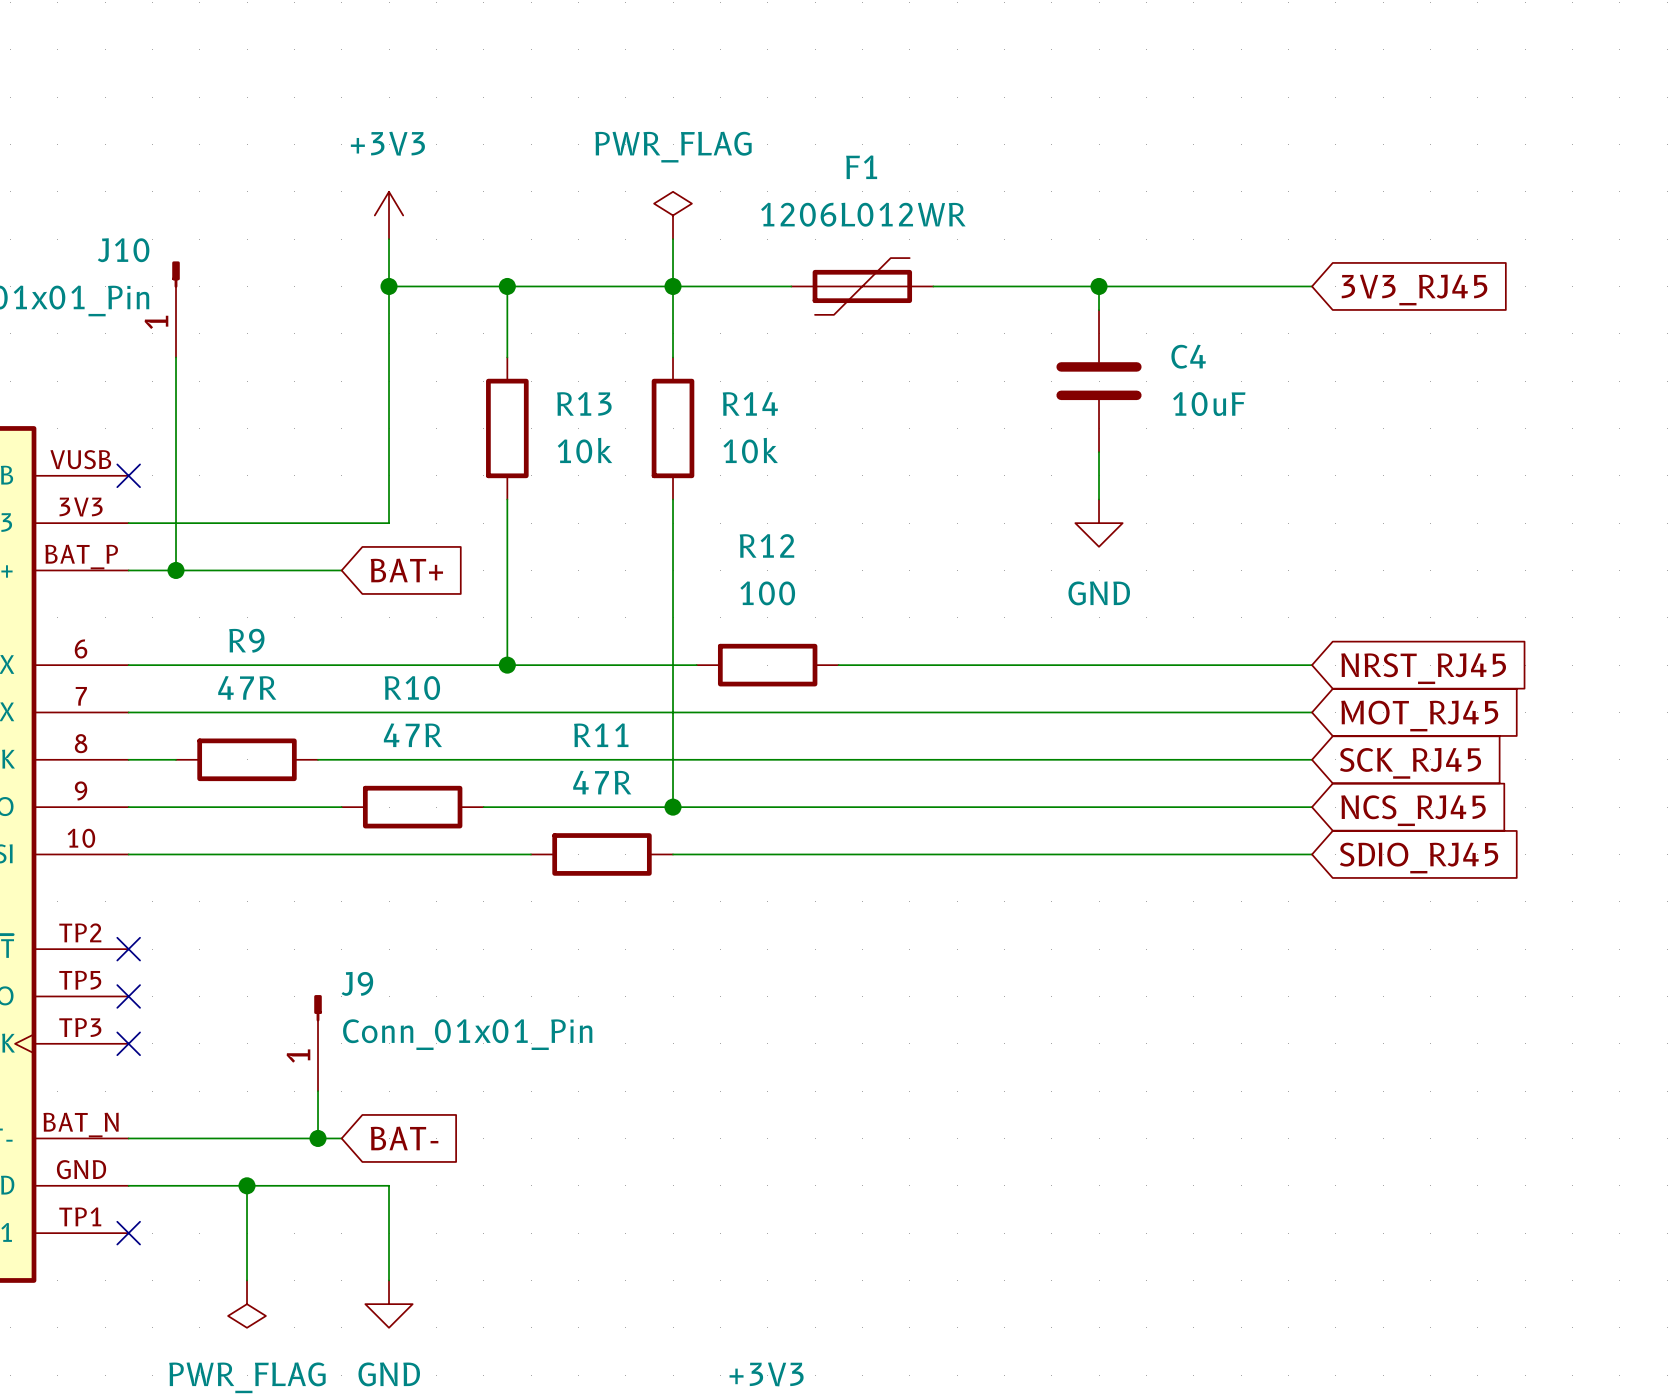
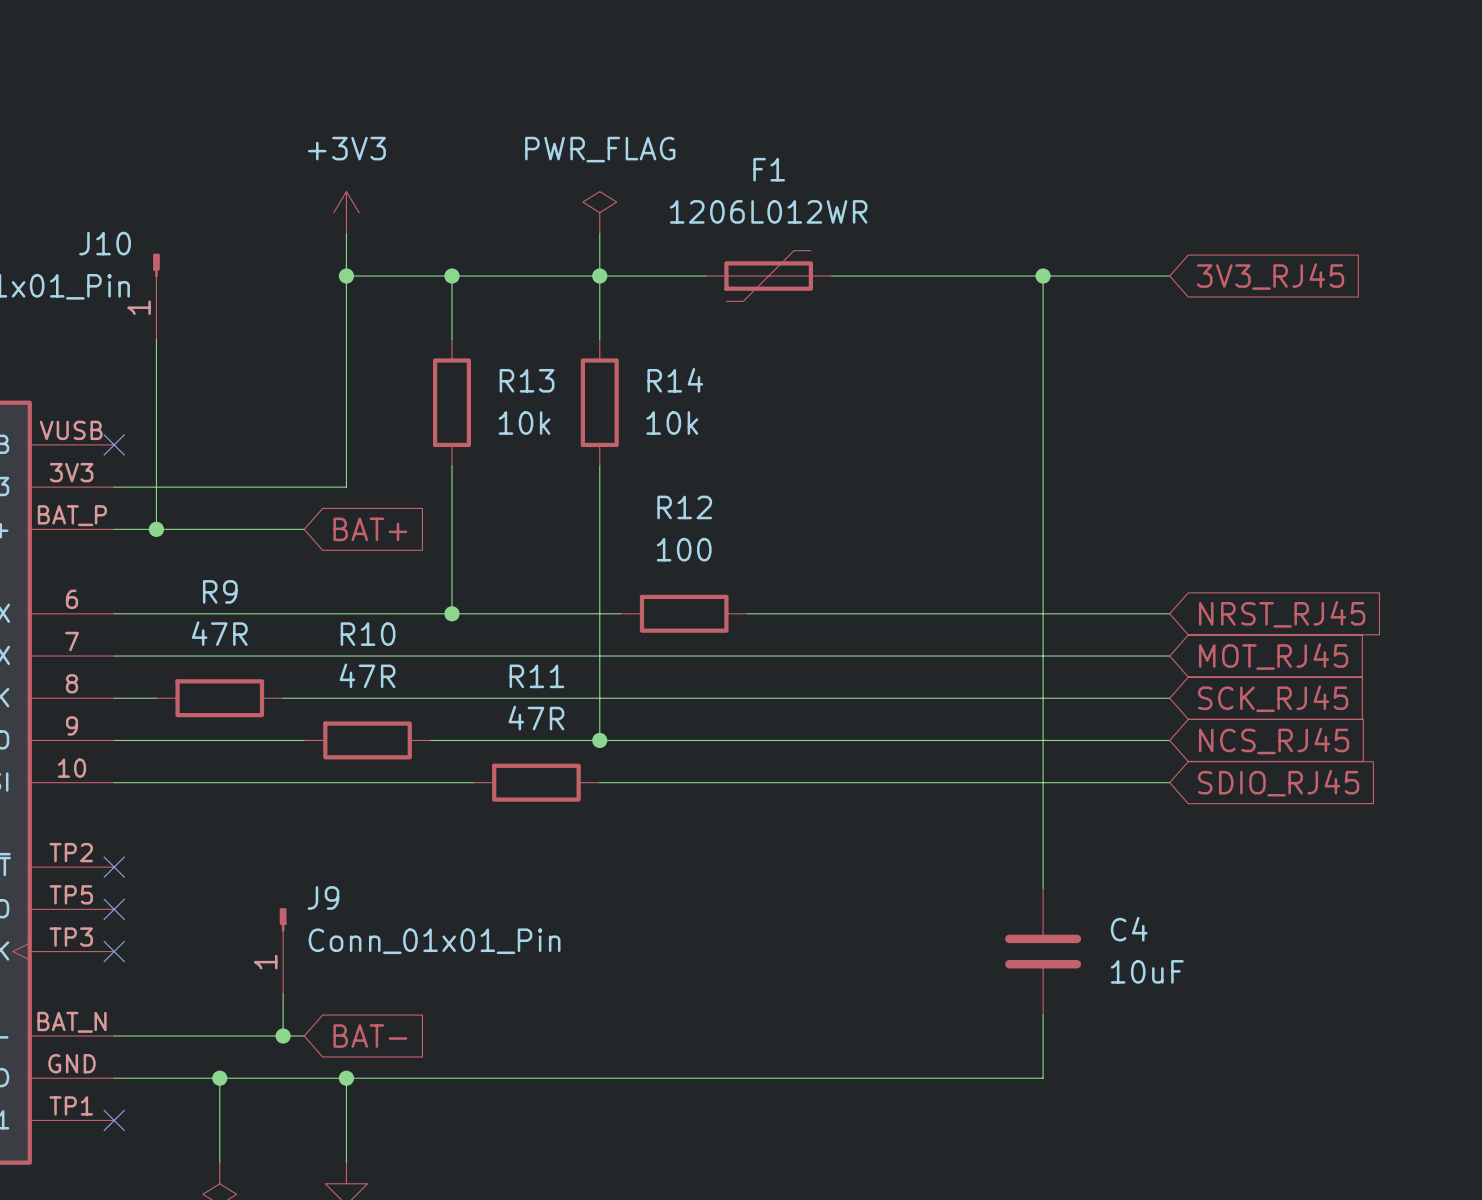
wire: (1099, 286) (1099, 310) -> none
junction position: (1099, 286) -> (1043, 276)
wire: none -> (1043, 276) (1043, 888)
C4 position: (1099, 381) -> (1043, 951)
wire: (1099, 452) (1099, 499) -> none
power symbol: GND (1099, 523) -> none
wire: none -> (1043, 1014) (1043, 1078) (346, 1078)
junction: none -> (346, 1078)

